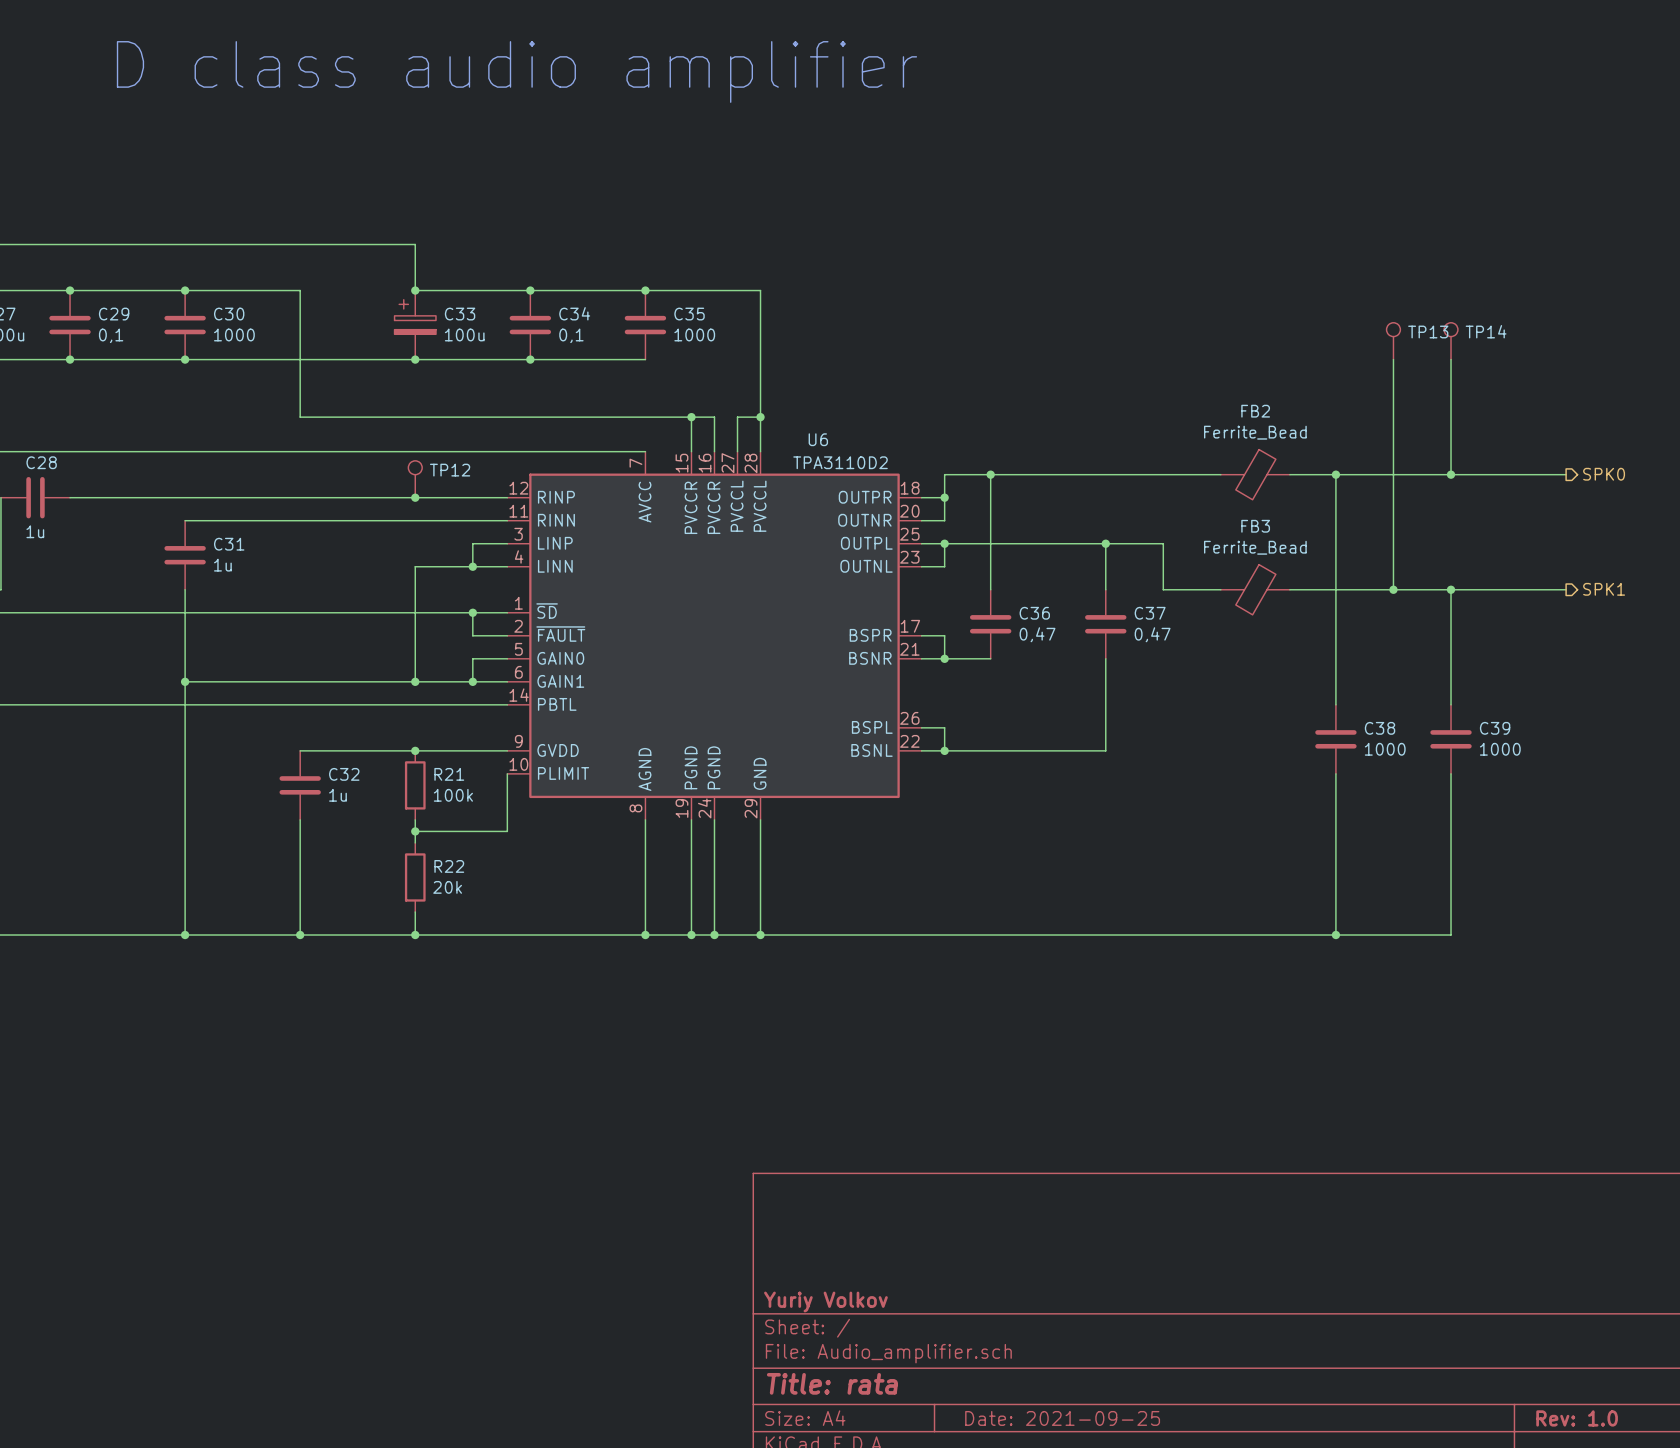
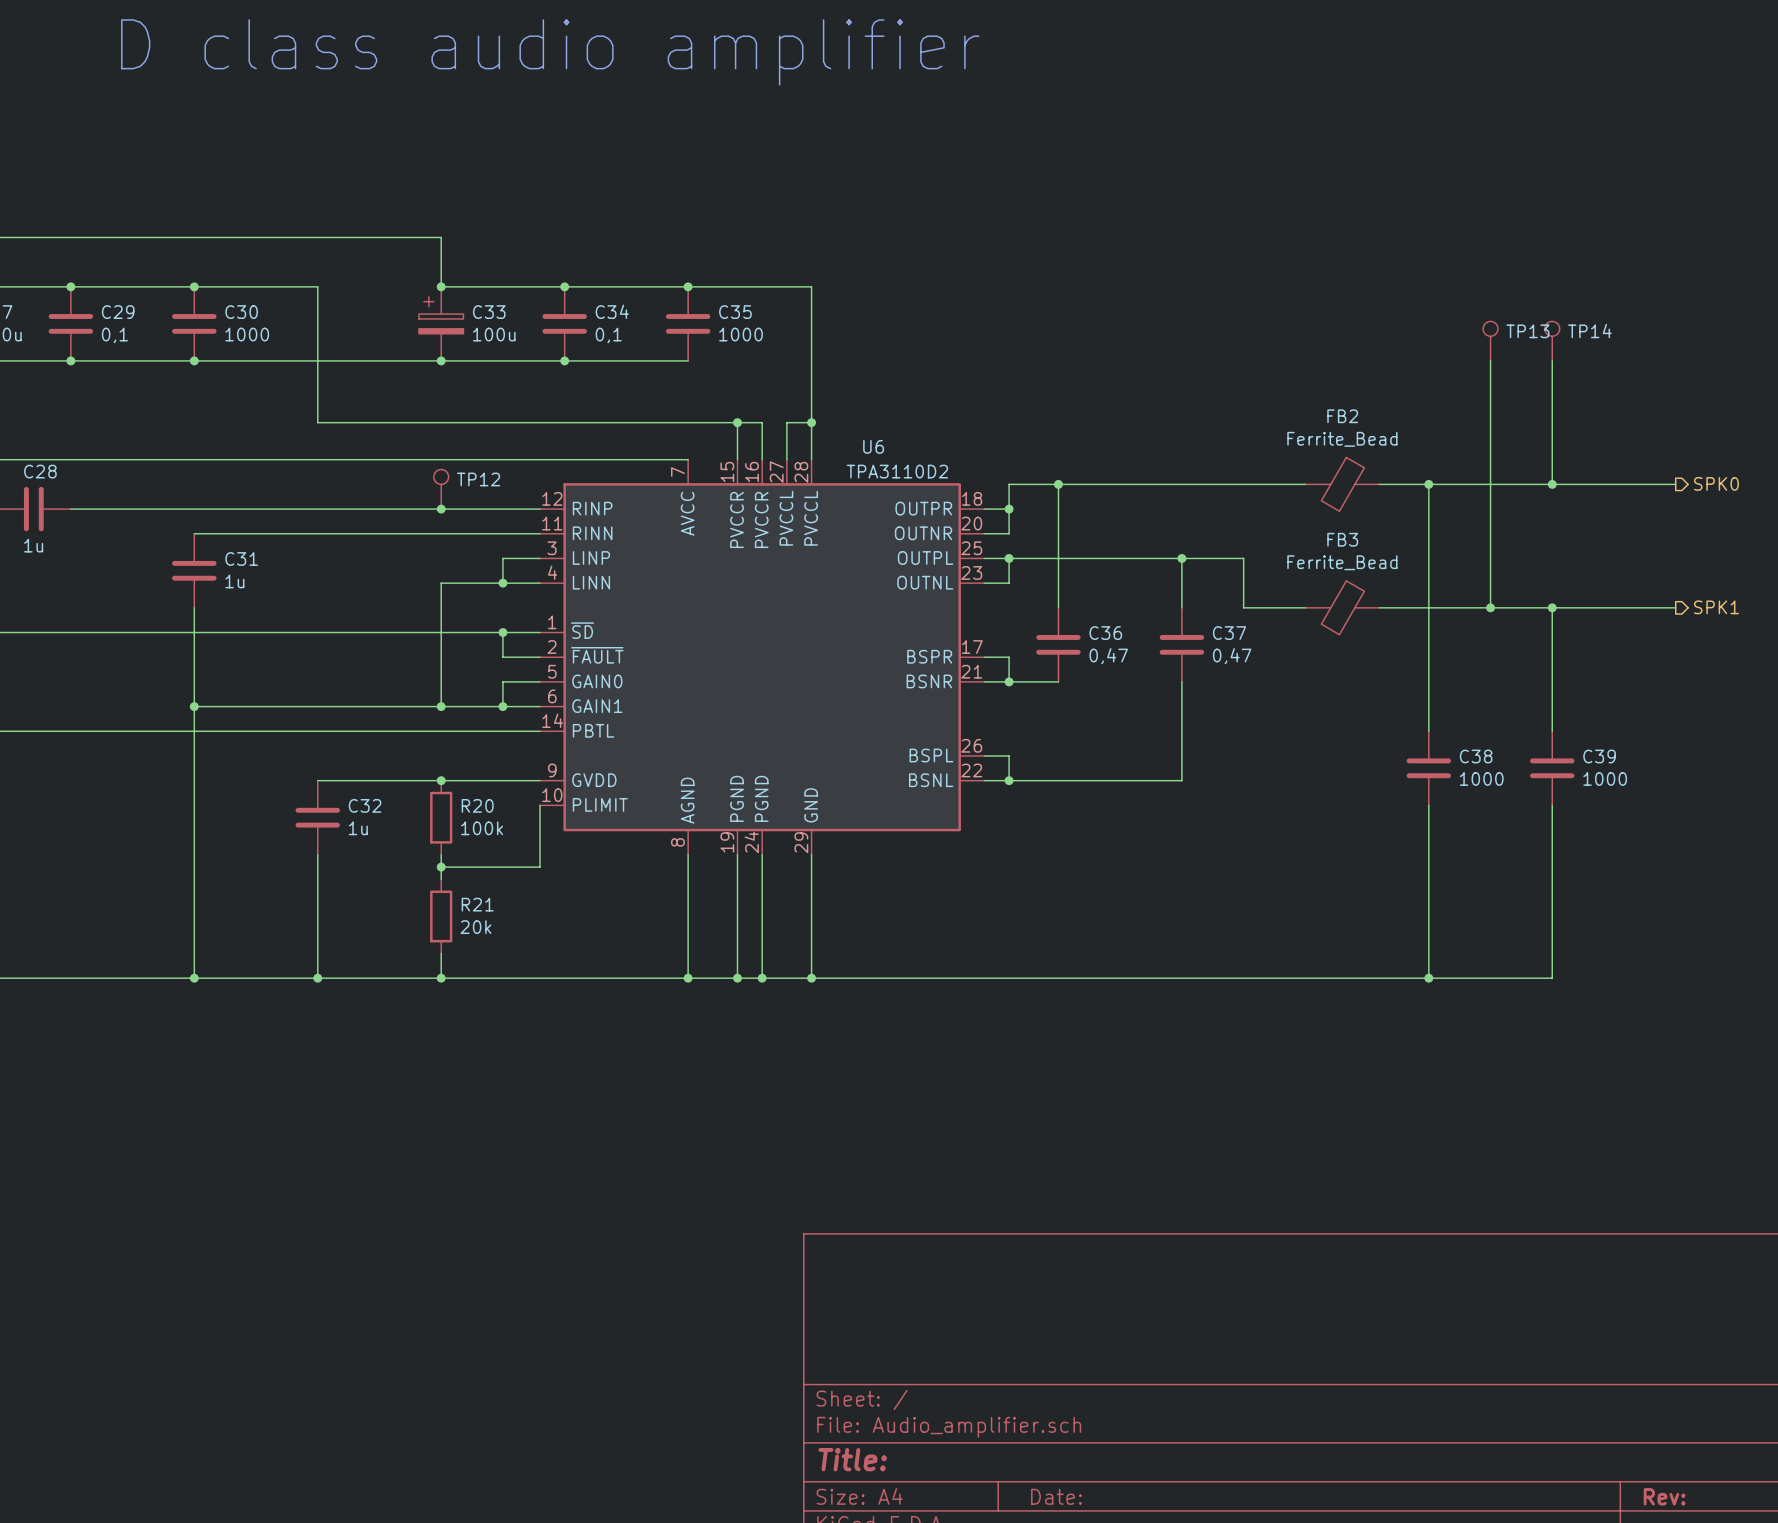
R21 name: R21 (449, 774) -> R20 (477, 805)
R22 name: R22 (449, 866) -> R21 (477, 904)
title block: Yuriy Volkov (825, 1302) -> none
title block: Title: rata (832, 1383) -> Title: (852, 1459)
title block: Date: 2021-09-25 (1062, 1418) -> Date: (1056, 1496)
title block: Rev: 1.0 (1577, 1418) -> Rev: (1664, 1496)

